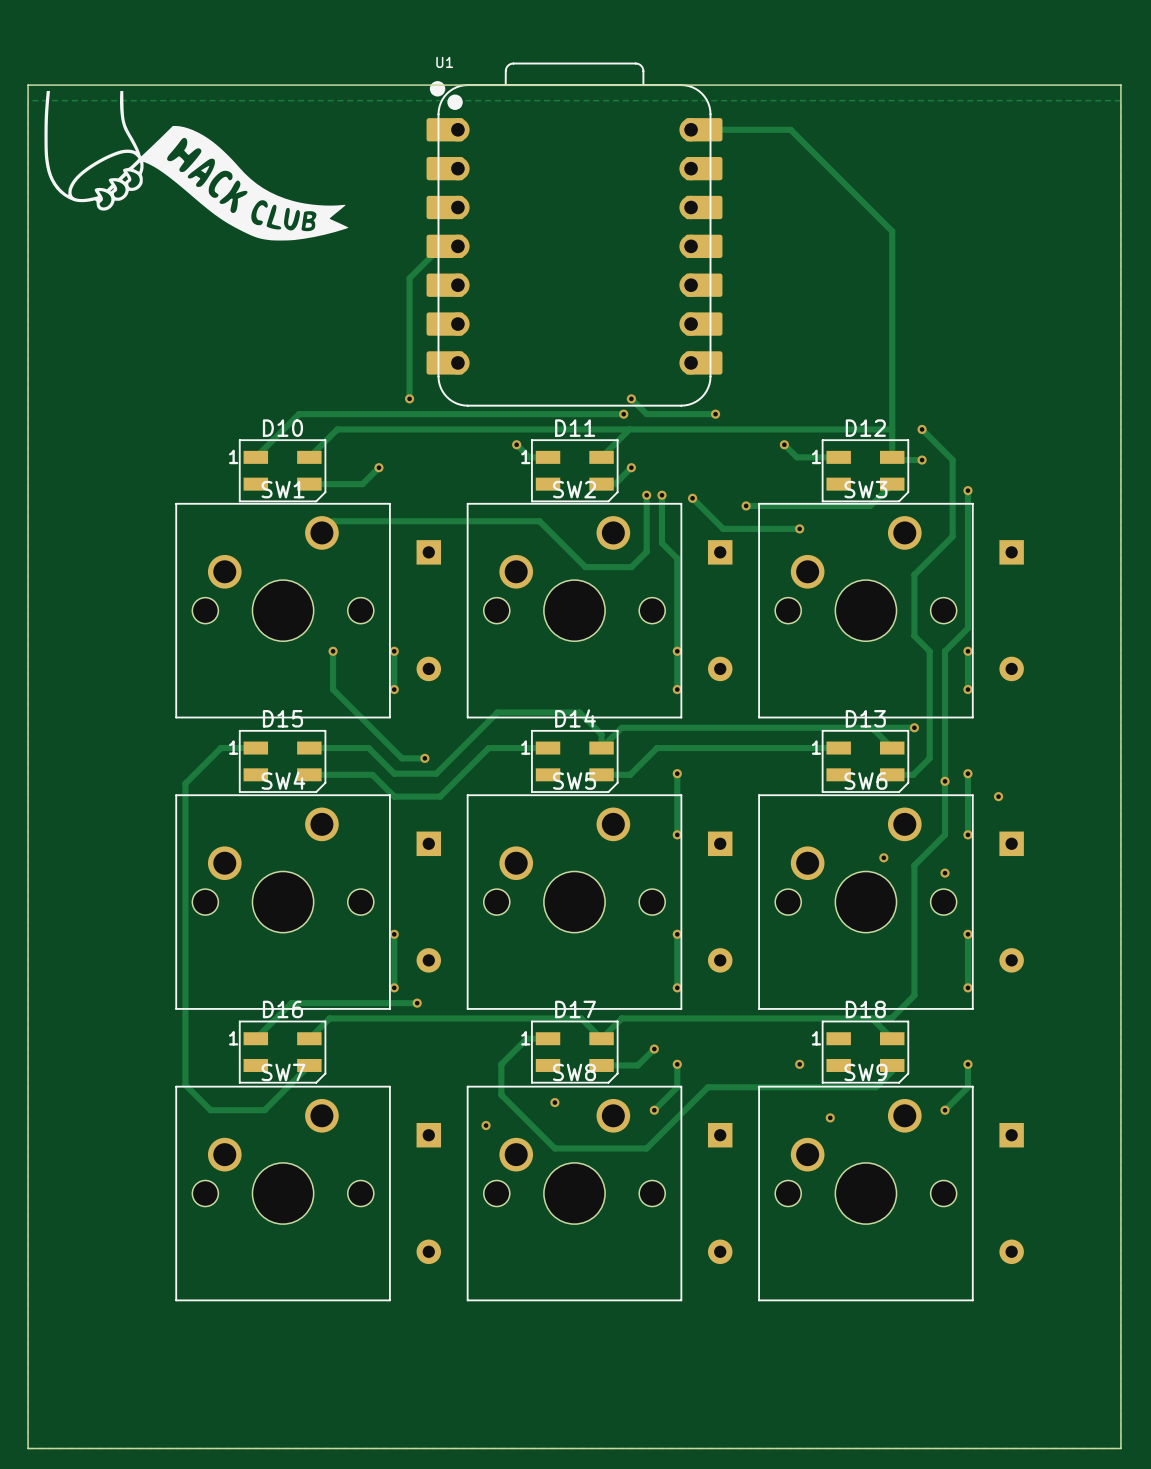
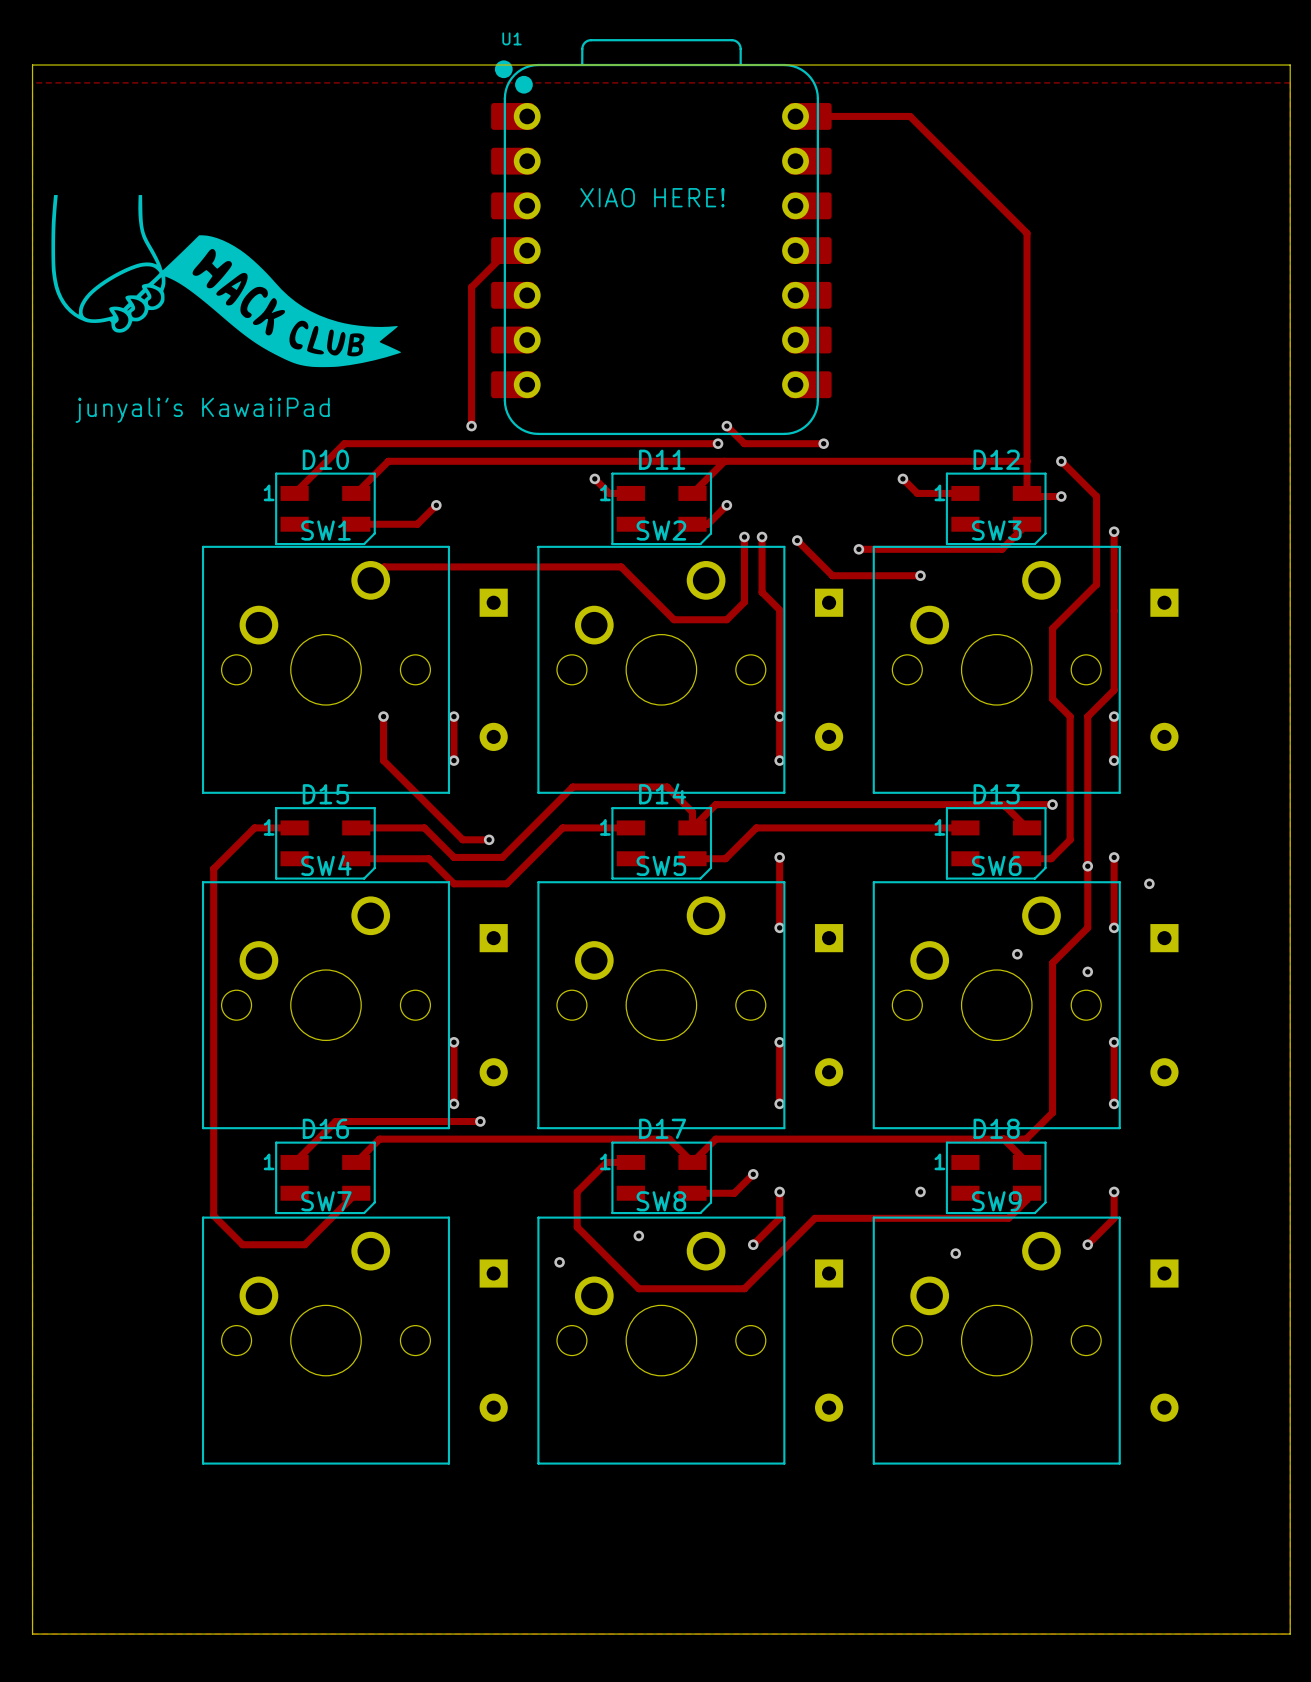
drawing position: (196, 165) -> (226, 281)
text: none -> XIAO HERE! (652, 197)
text: none -> junyali's KawaiiPad (202, 410)

